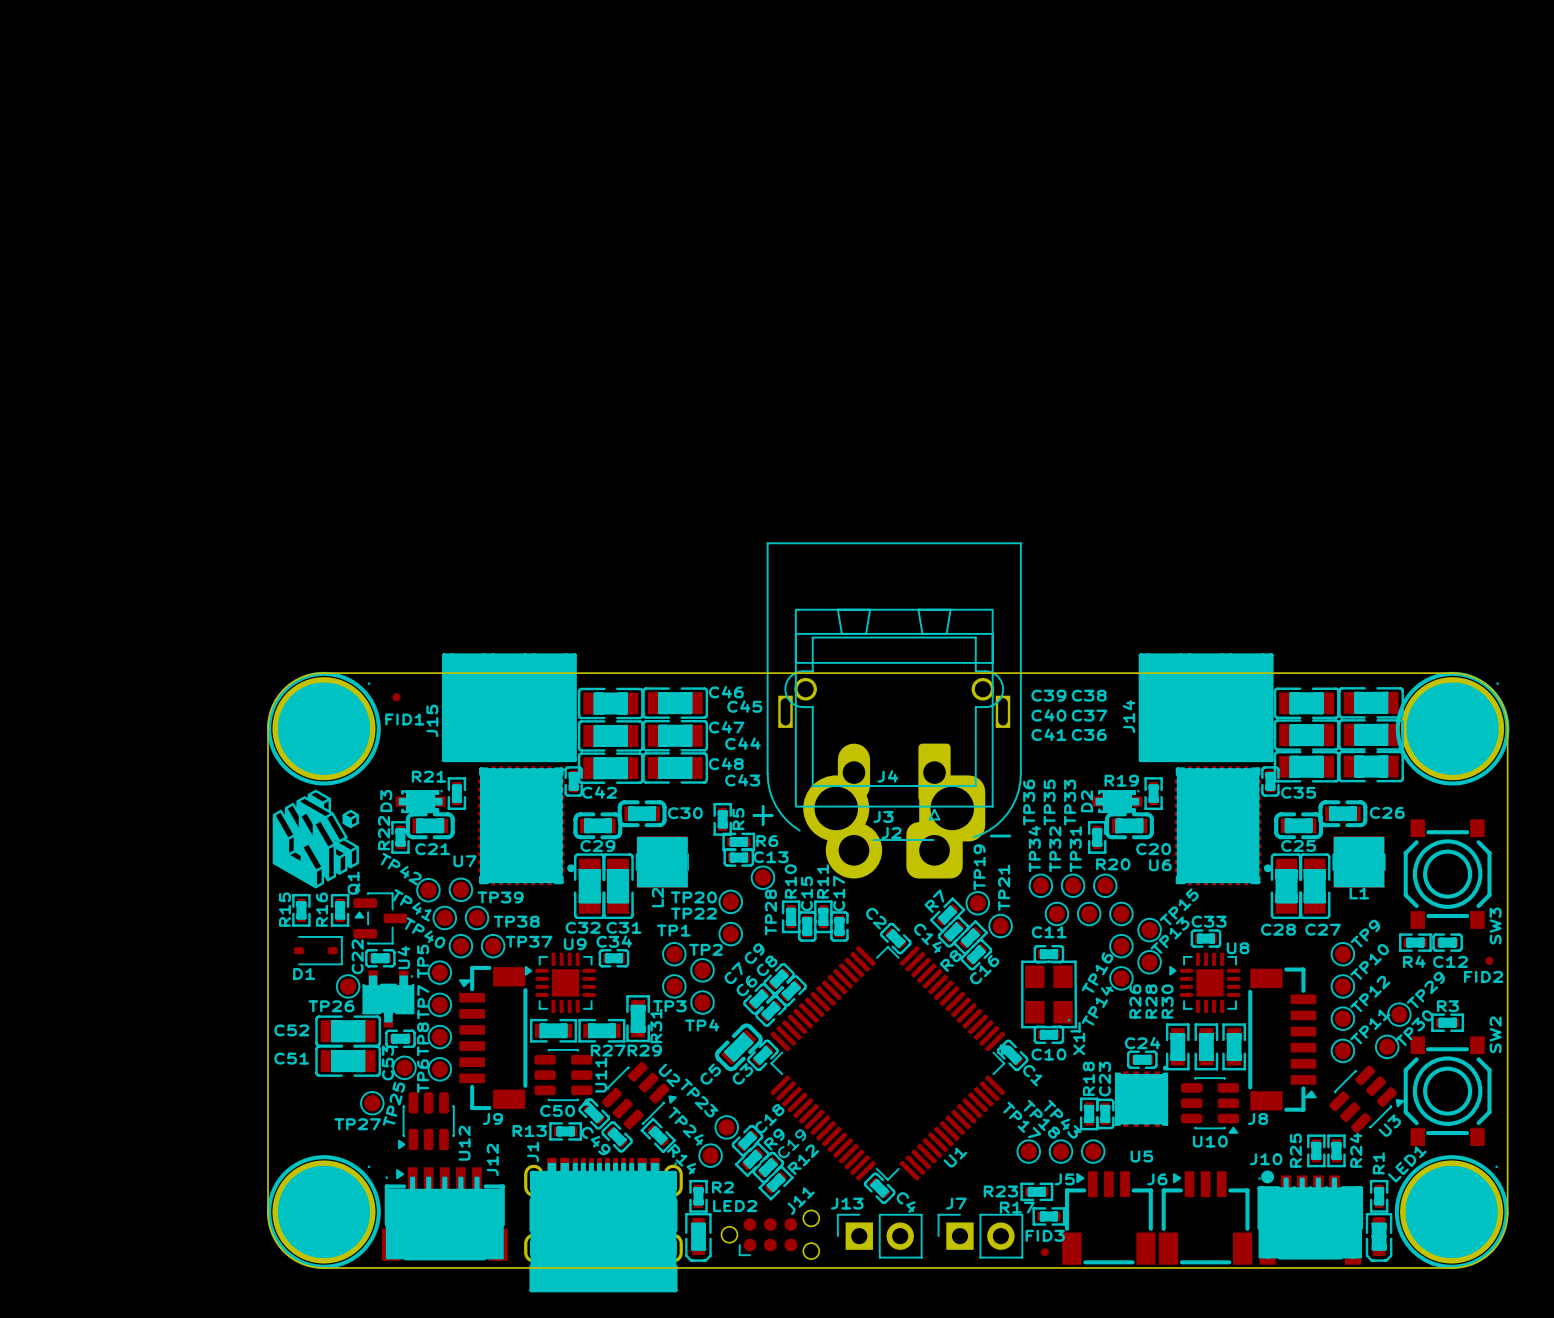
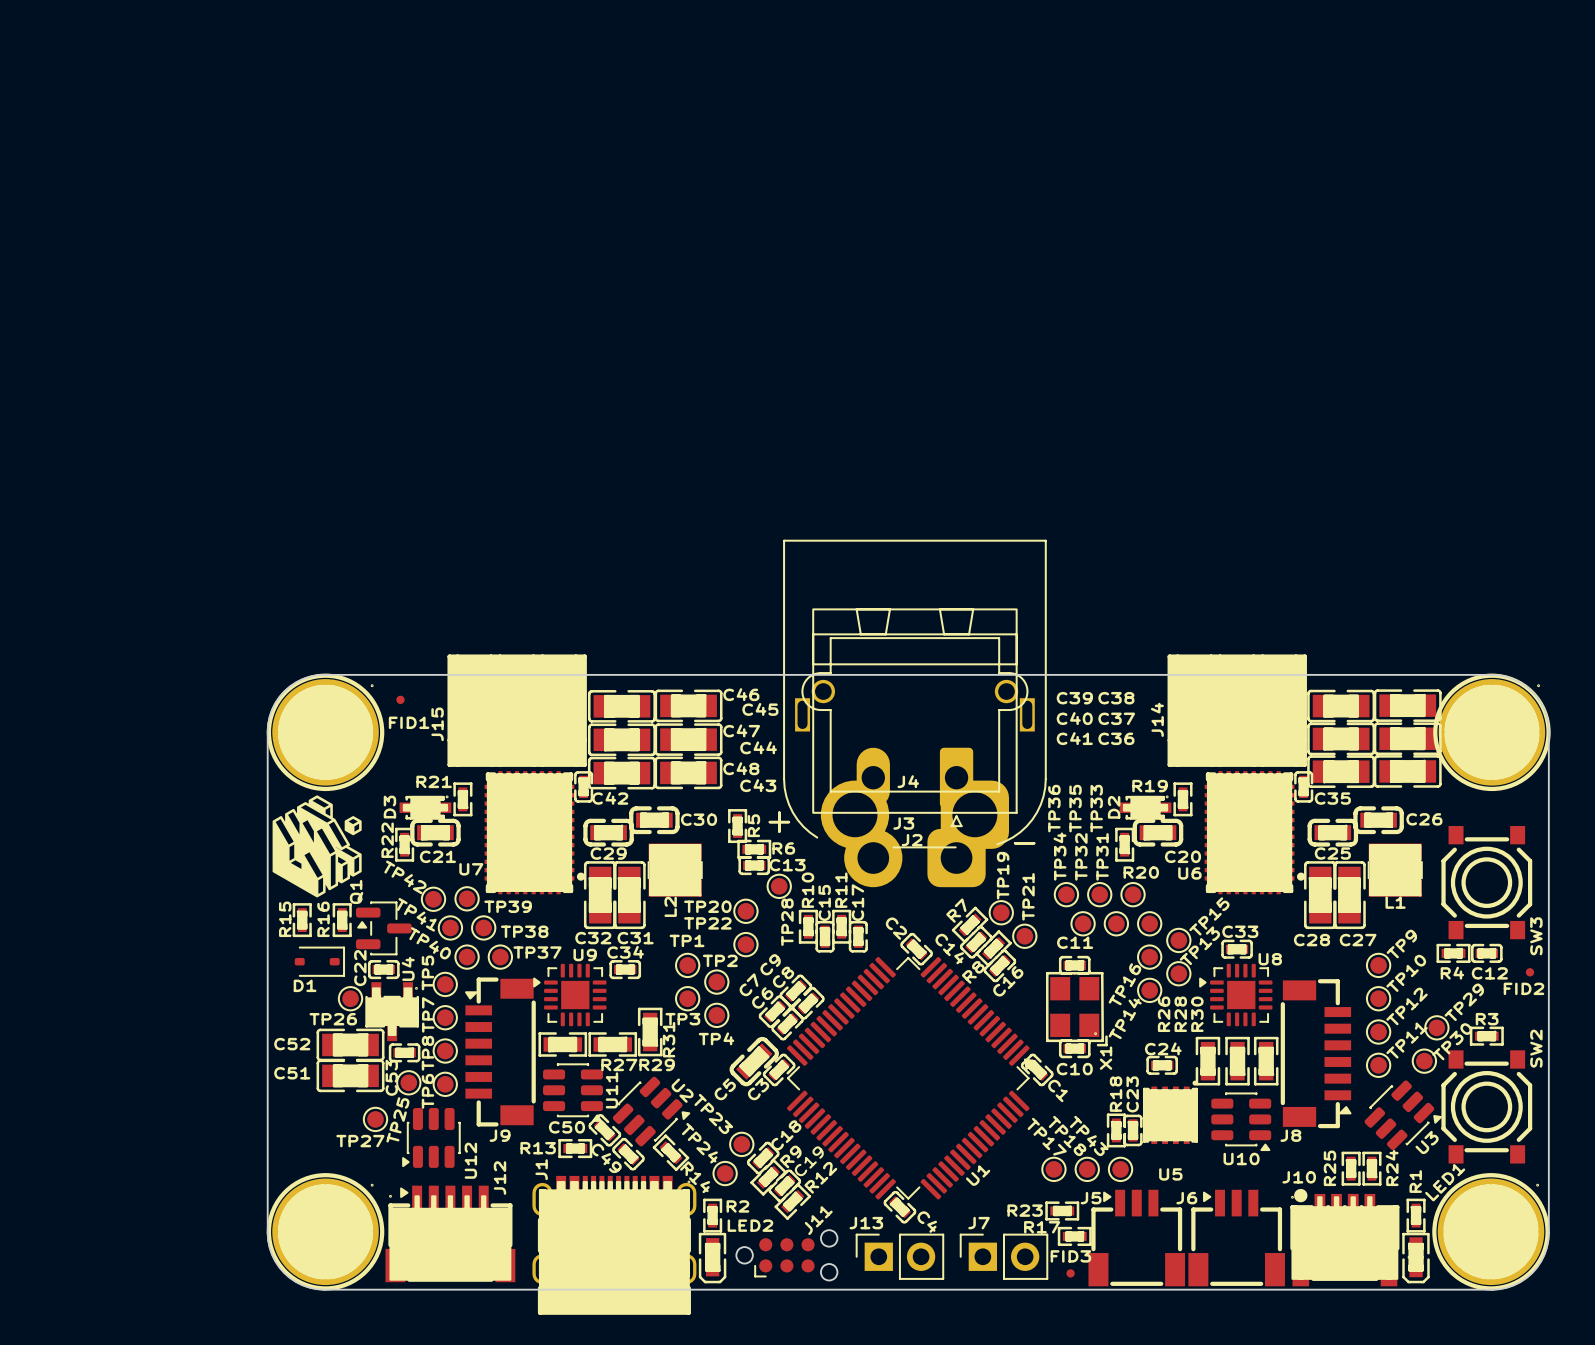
C24 rotation: 0° (1142, 1059) -> 180° (1162, 1065)

